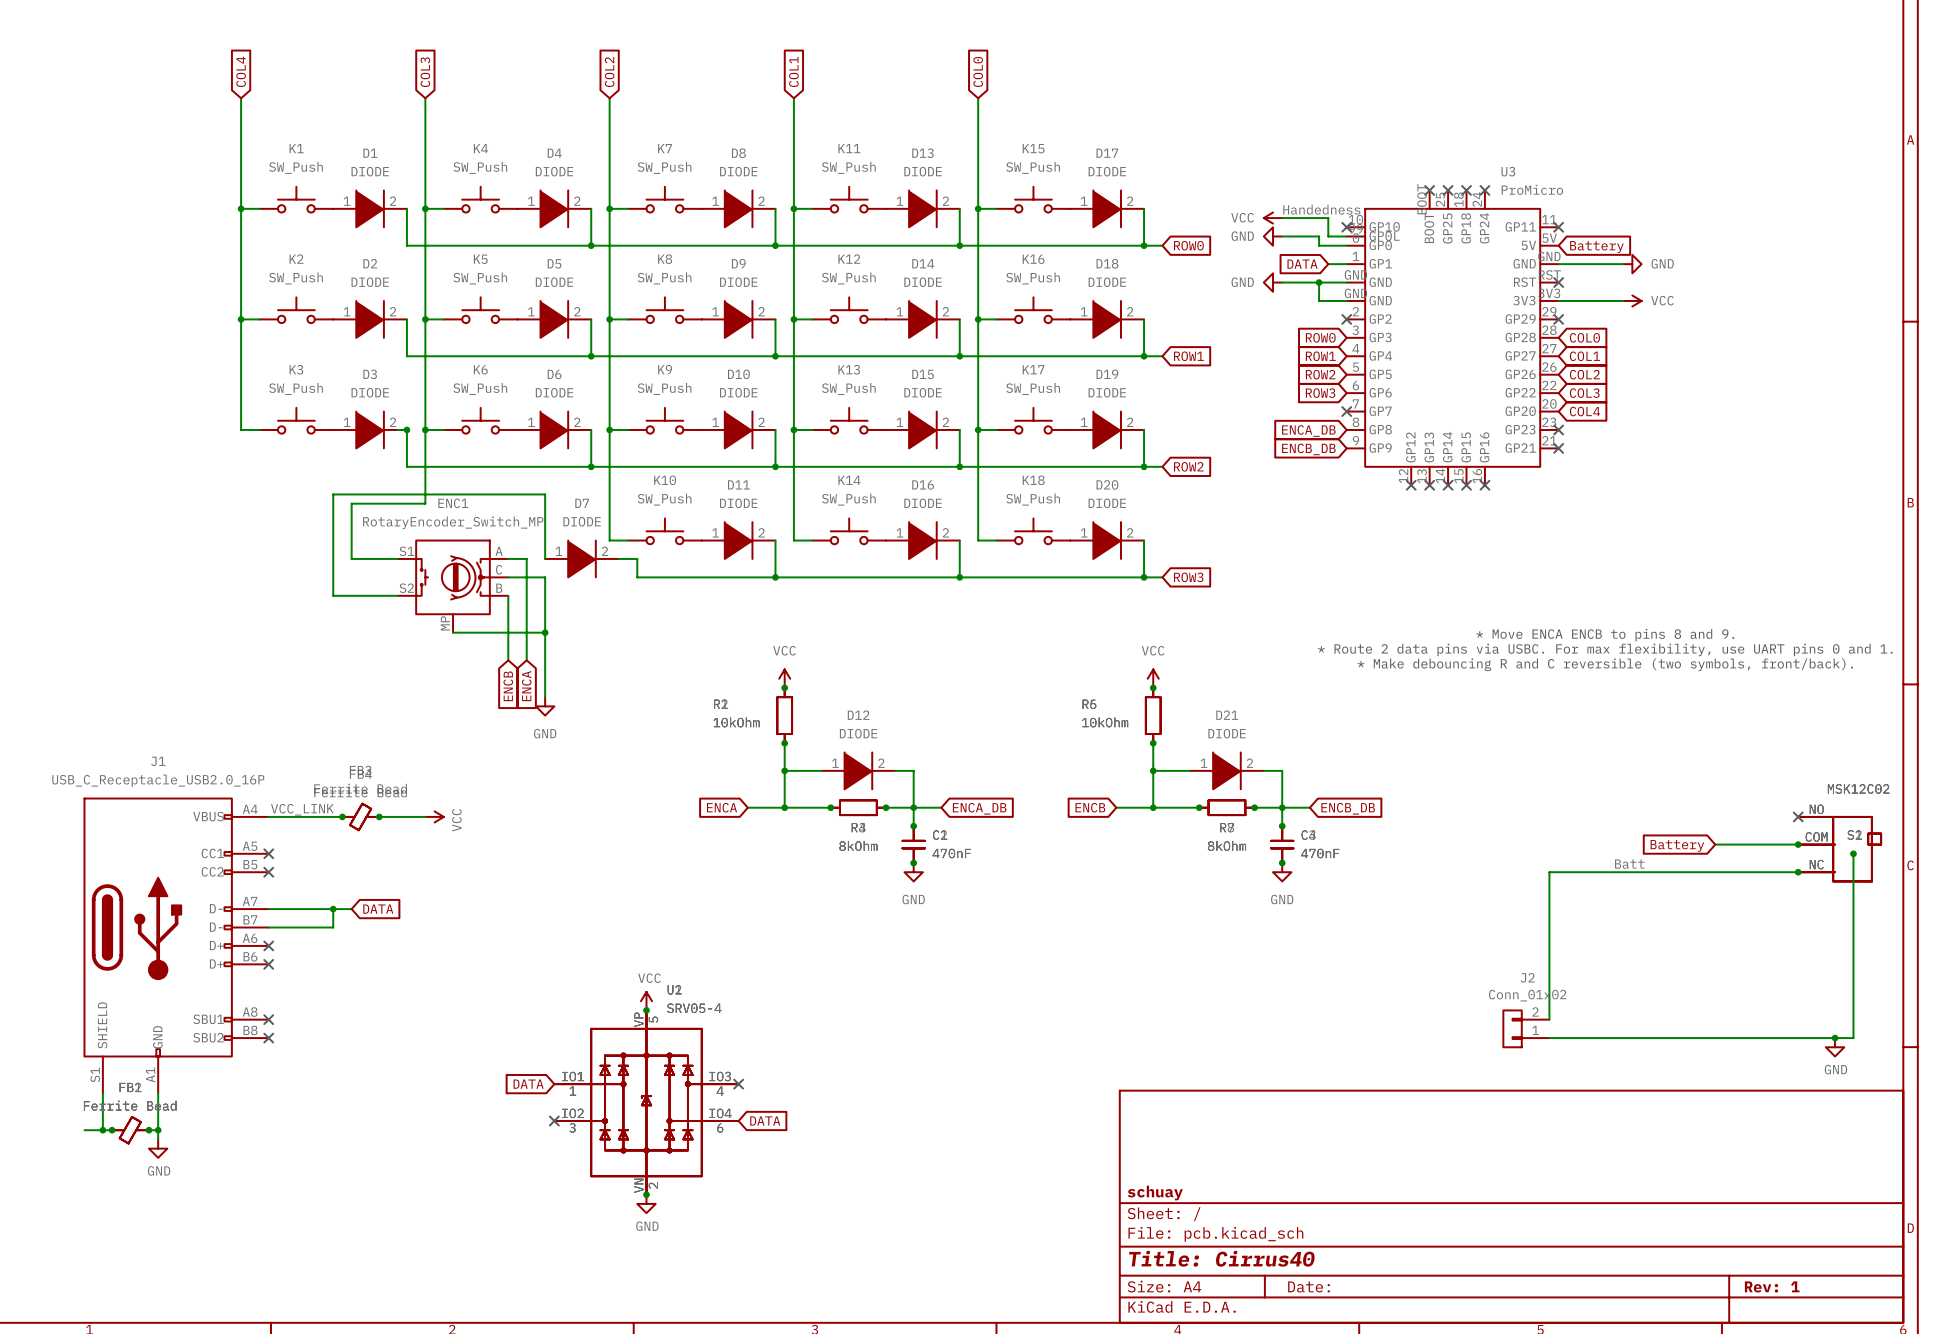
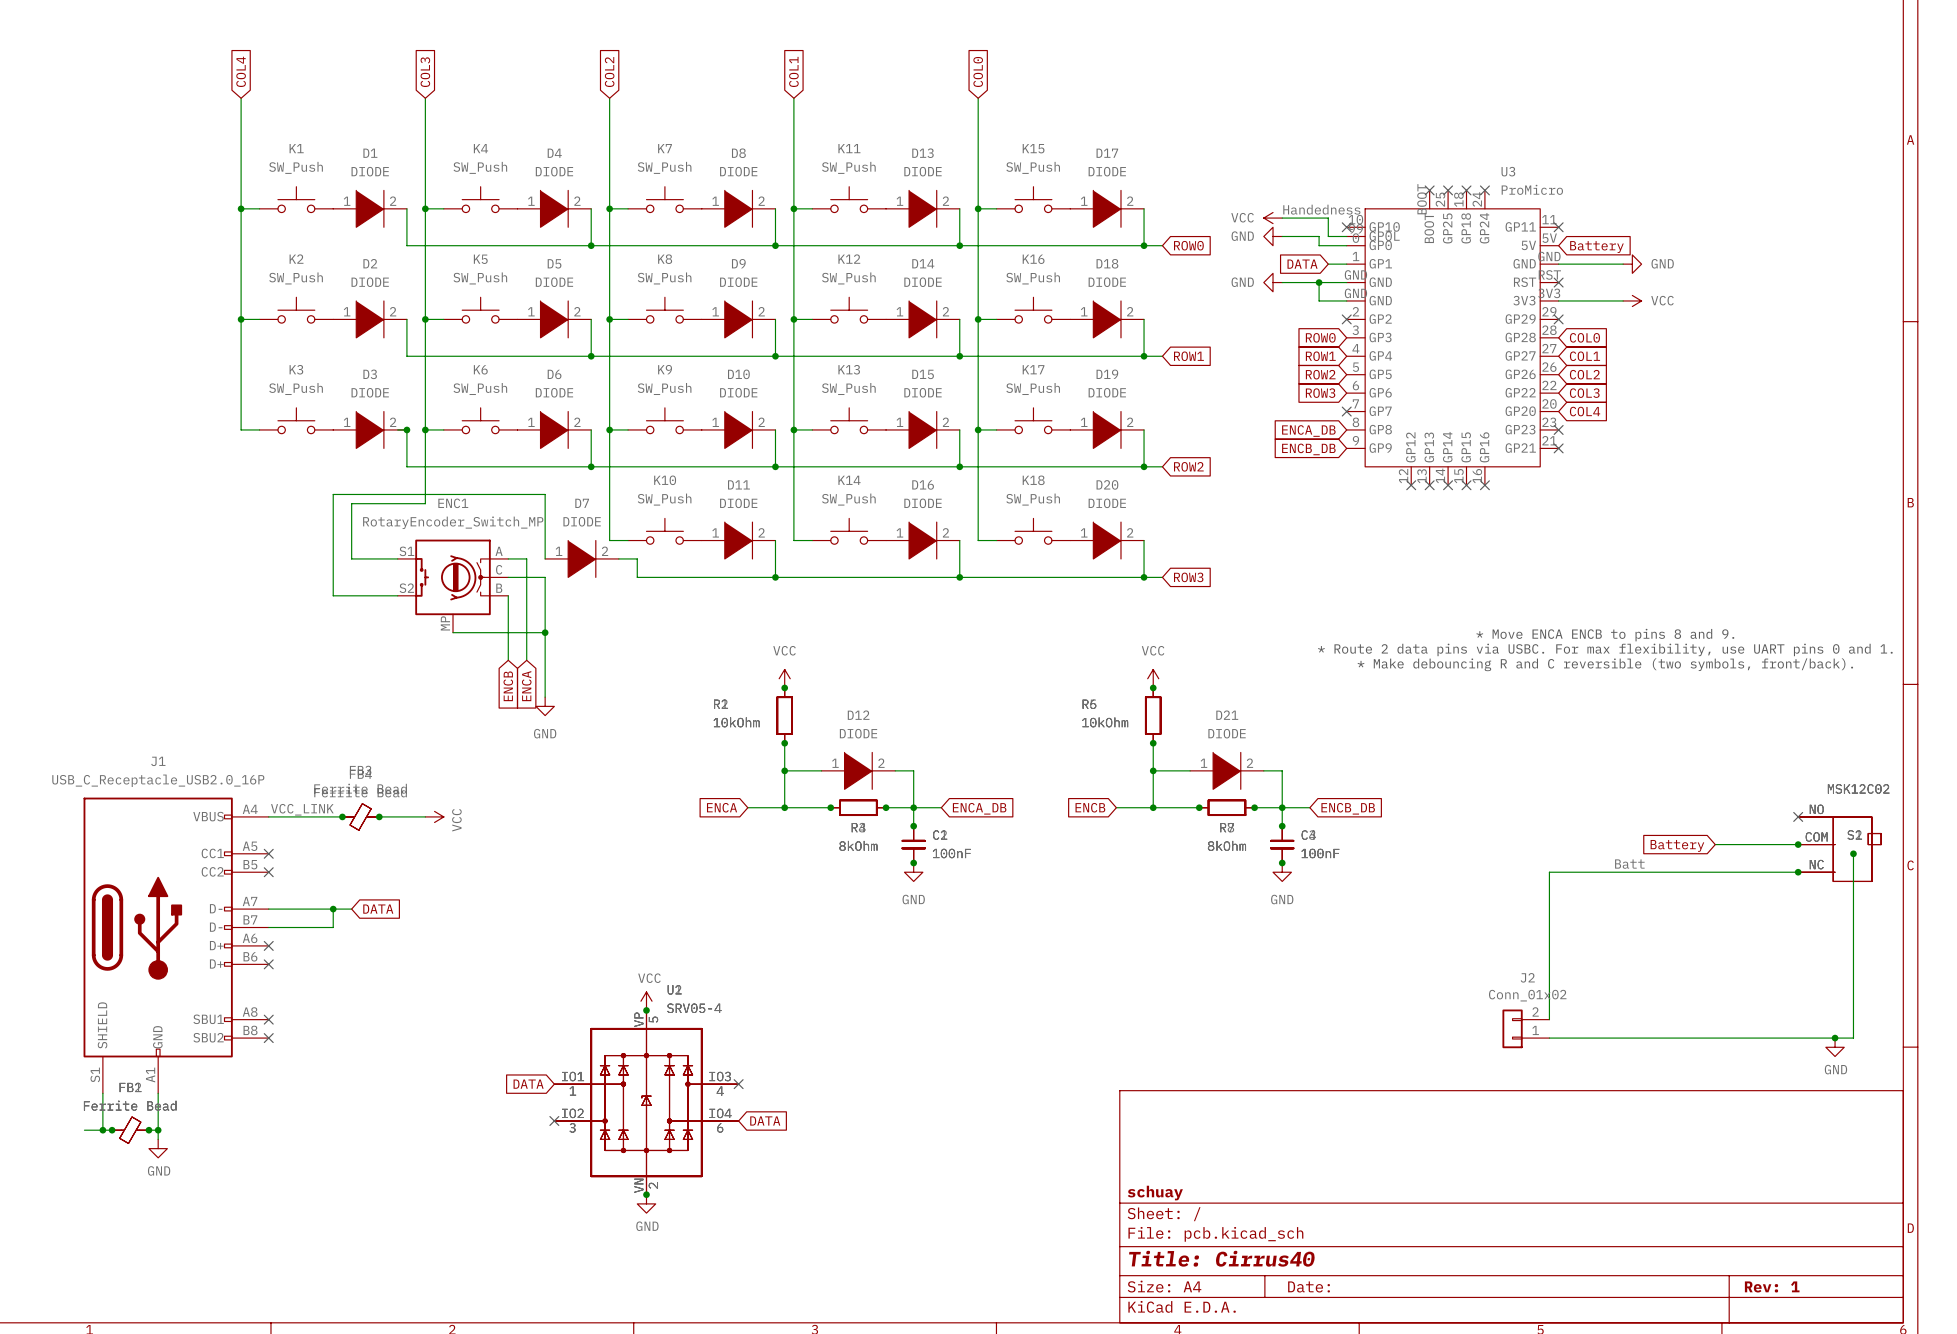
part value: 470nF (951, 853) -> 100nF (951, 853)
part value: 470nF (951, 853) -> 100nF (951, 853)
part value: 470nF (1320, 853) -> 100nF (1320, 853)
part value: 470nF (1320, 853) -> 100nF (1320, 853)

